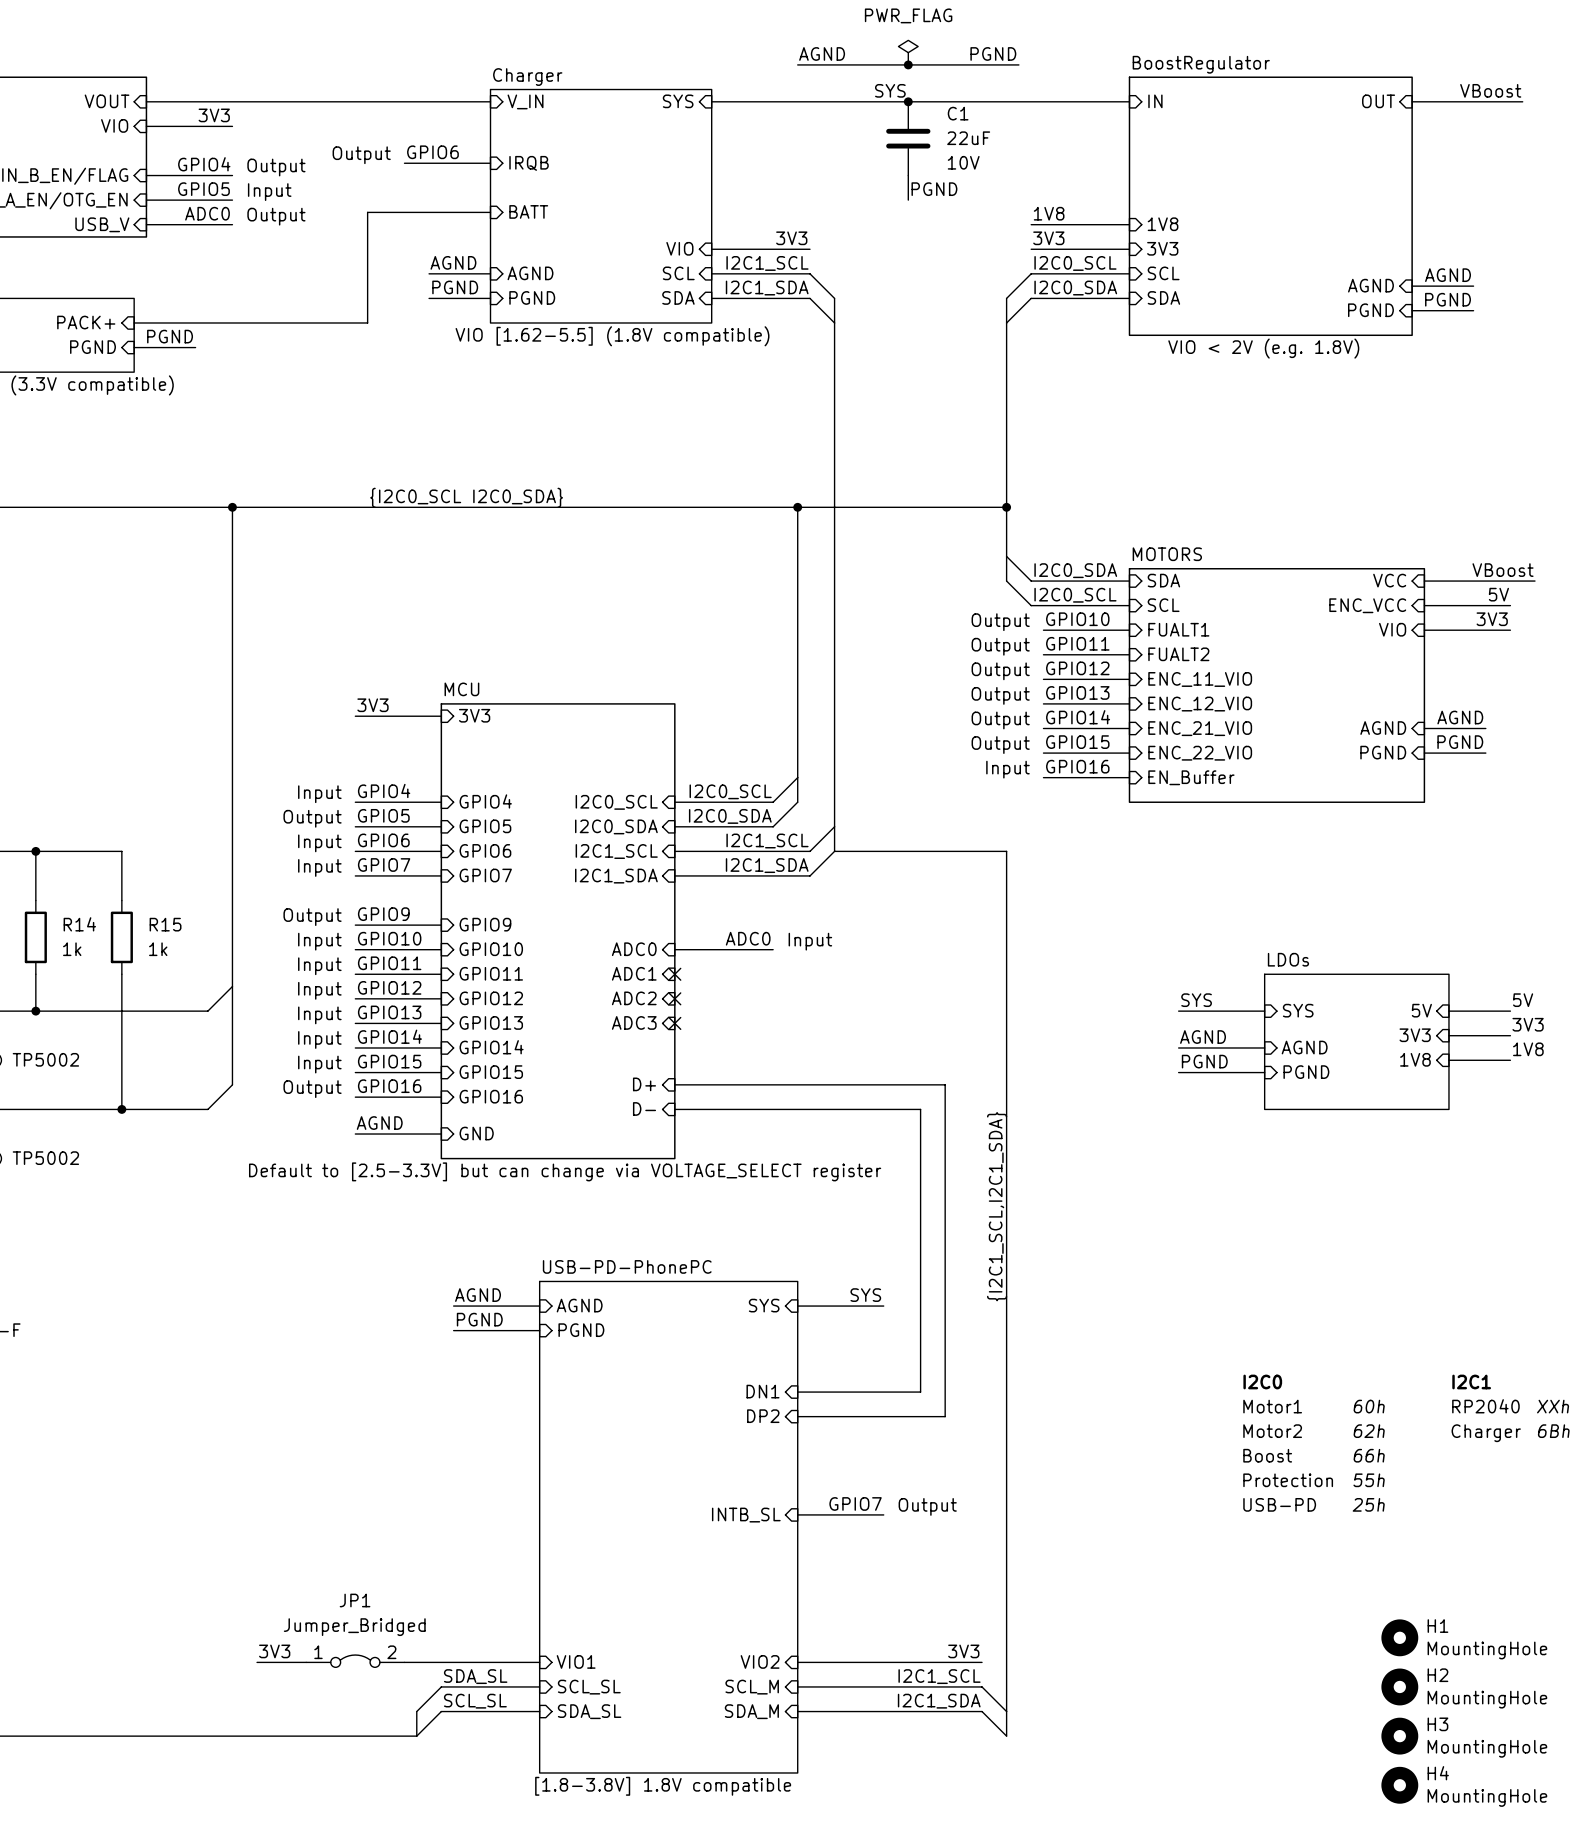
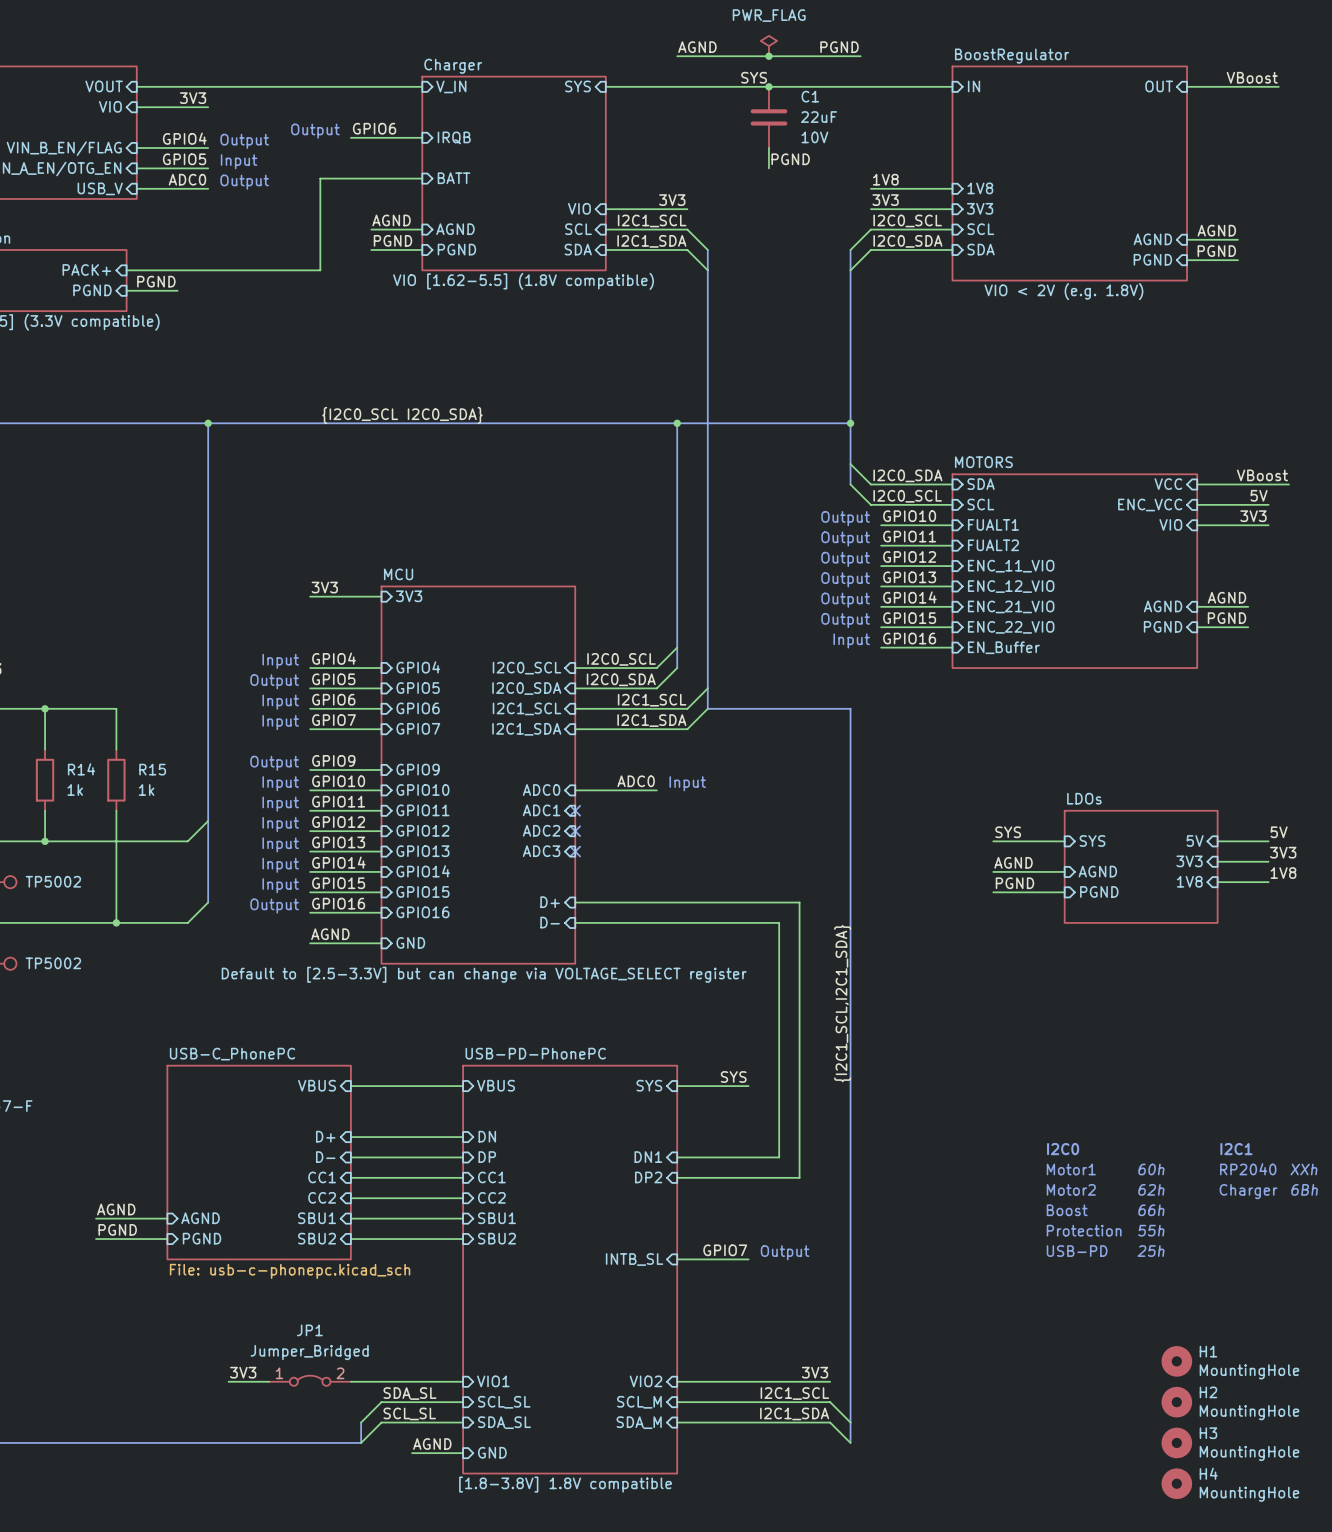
label: AGND (478, 1295) -> none
sheet pin: none -> VBUS (317, 1085)
sheet pin: AGND (579, 1305) -> VBUS (496, 1085)
wire: none -> (350, 1086) (391, 1086)
label: PGND (479, 1319) -> none
wire: (453, 1330) (539, 1330) -> none
sheet pin: PGND (581, 1330) -> none
sheet pin: none -> D+ (325, 1136)
wire: none -> (350, 1137) (463, 1137)
sheet pin: none -> DN (487, 1136)
sheet pin: none -> D- (325, 1157)
sheet pin: none -> DP (487, 1157)
wire: none -> (350, 1157) (463, 1157)
sheet USB-C_PhonePC: none -> File: usb-c-phonepc.kicad_sch (259, 1162)
sheet pin: none -> CC1 (322, 1177)
wire: none -> (350, 1177) (463, 1177)
sheet pin: none -> CC1 (491, 1177)
sheet pin: none -> CC2 (322, 1197)
sheet pin: none -> CC2 (491, 1197)
wire: none -> (350, 1198) (463, 1198)
label: none -> AGND (116, 1209)
wire: none -> (96, 1218) (167, 1218)
sheet pin: none -> AGND (200, 1218)
sheet pin: none -> SBU1 (317, 1218)
wire: none -> (350, 1218) (463, 1218)
sheet pin: none -> SBU1 (496, 1218)
label: none -> PGND (117, 1229)
sheet pin: none -> PGND (202, 1238)
sheet pin: none -> SBU2 (317, 1238)
sheet pin: none -> SBU2 (496, 1238)
wire: none -> (96, 1239) (167, 1239)
wire: none -> (350, 1239) (463, 1239)
label: none -> AGND (432, 1444)
sheet pin: none -> GND (492, 1452)
wire: none -> (412, 1453) (463, 1453)

